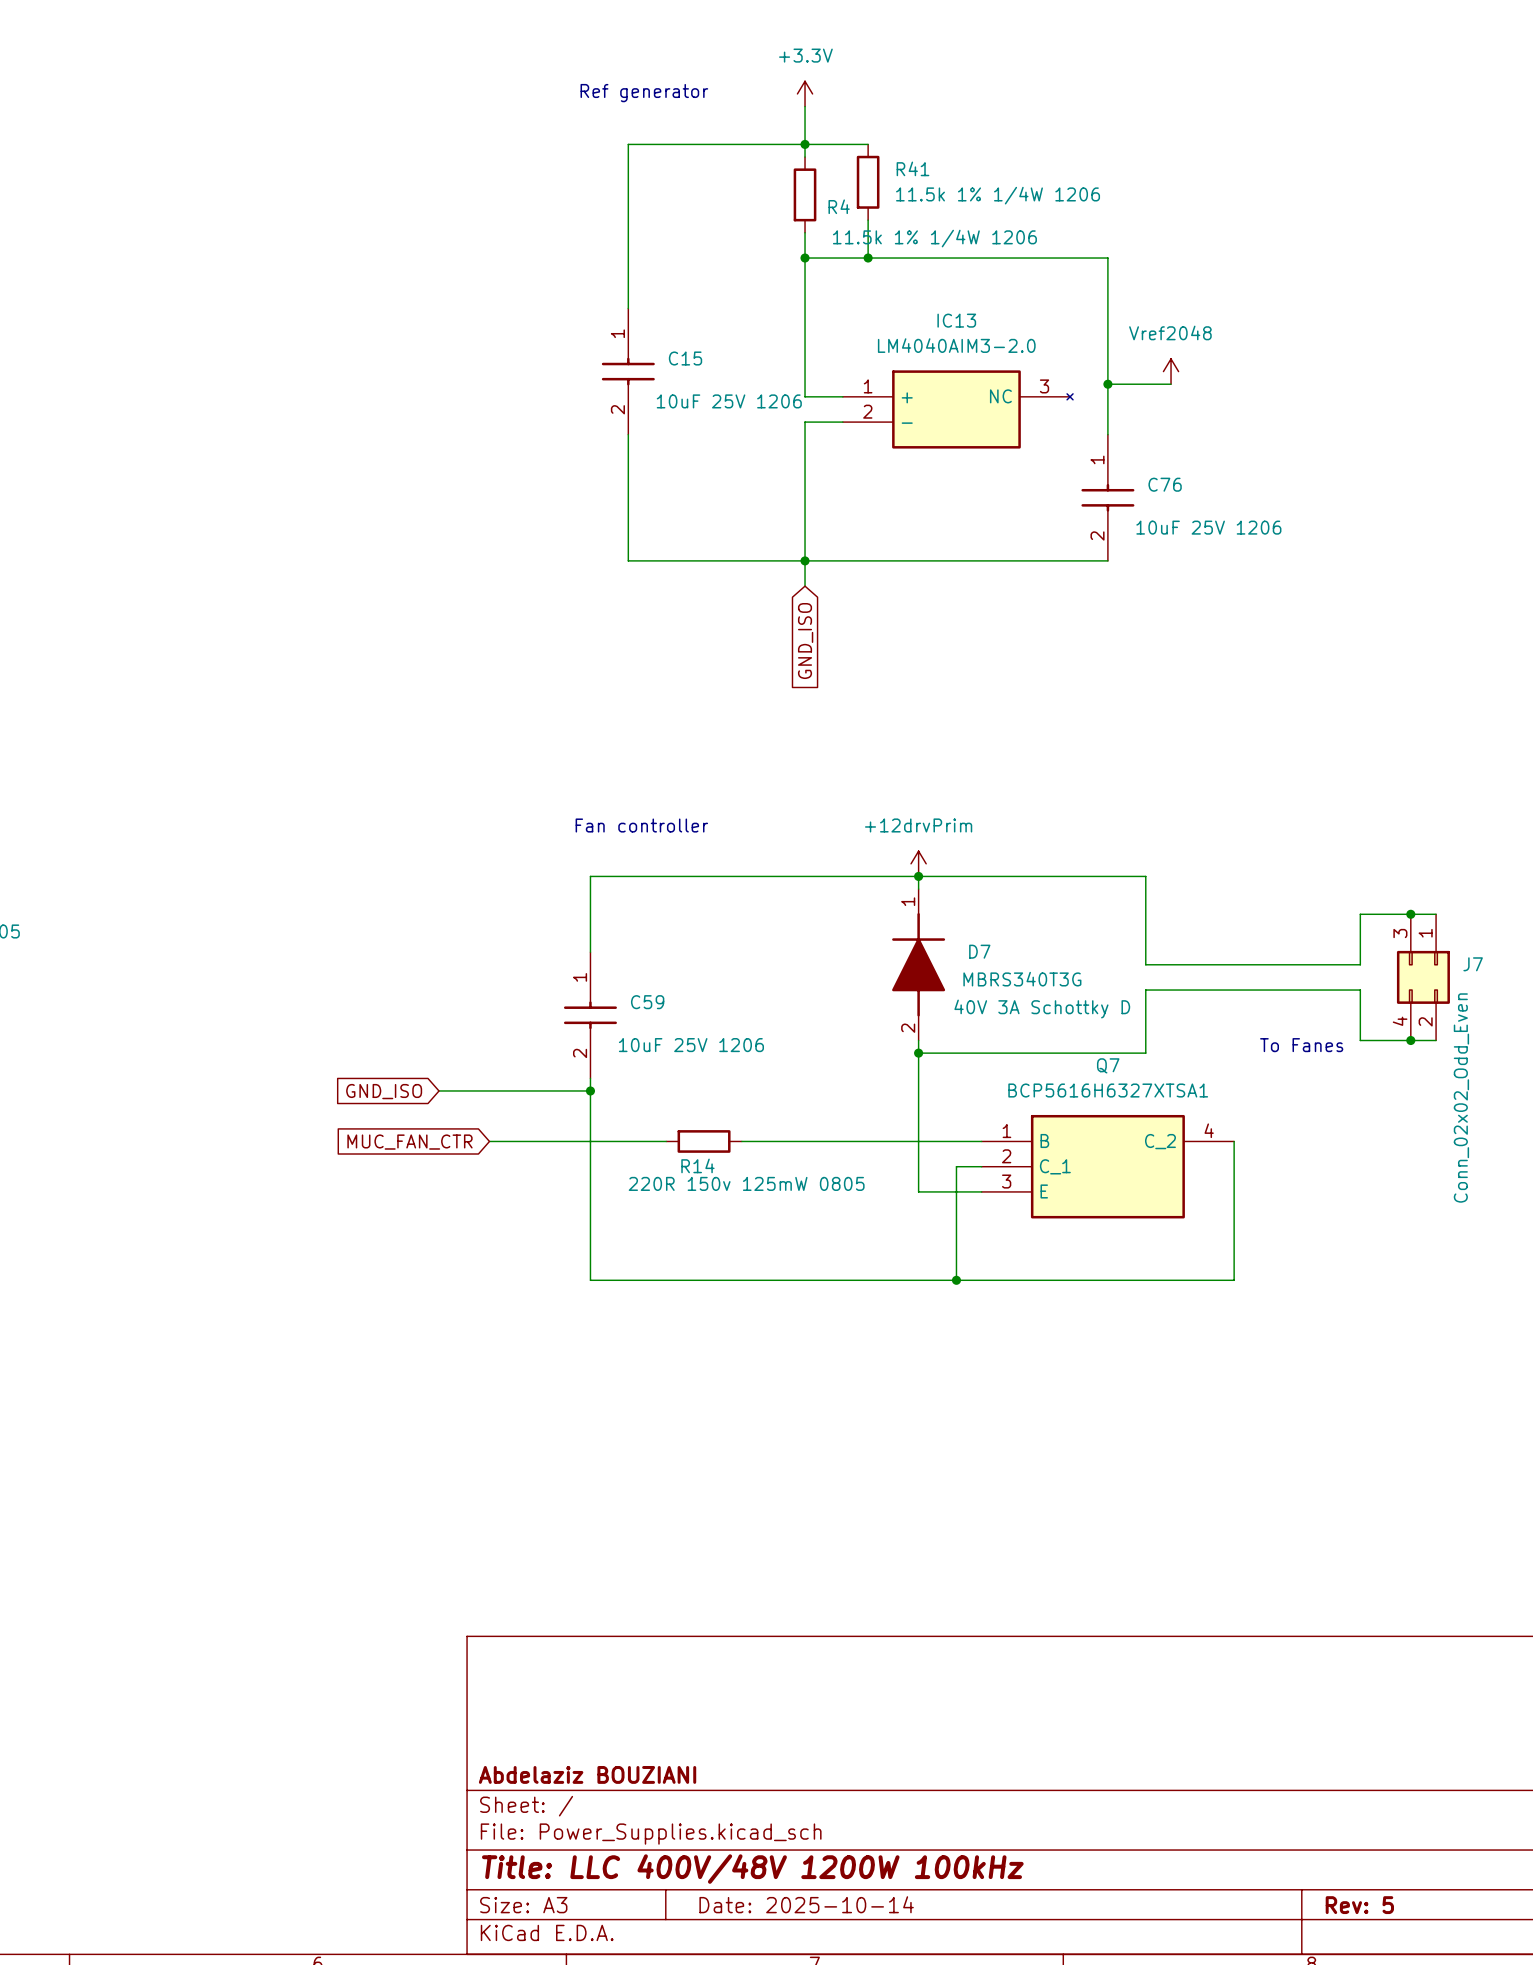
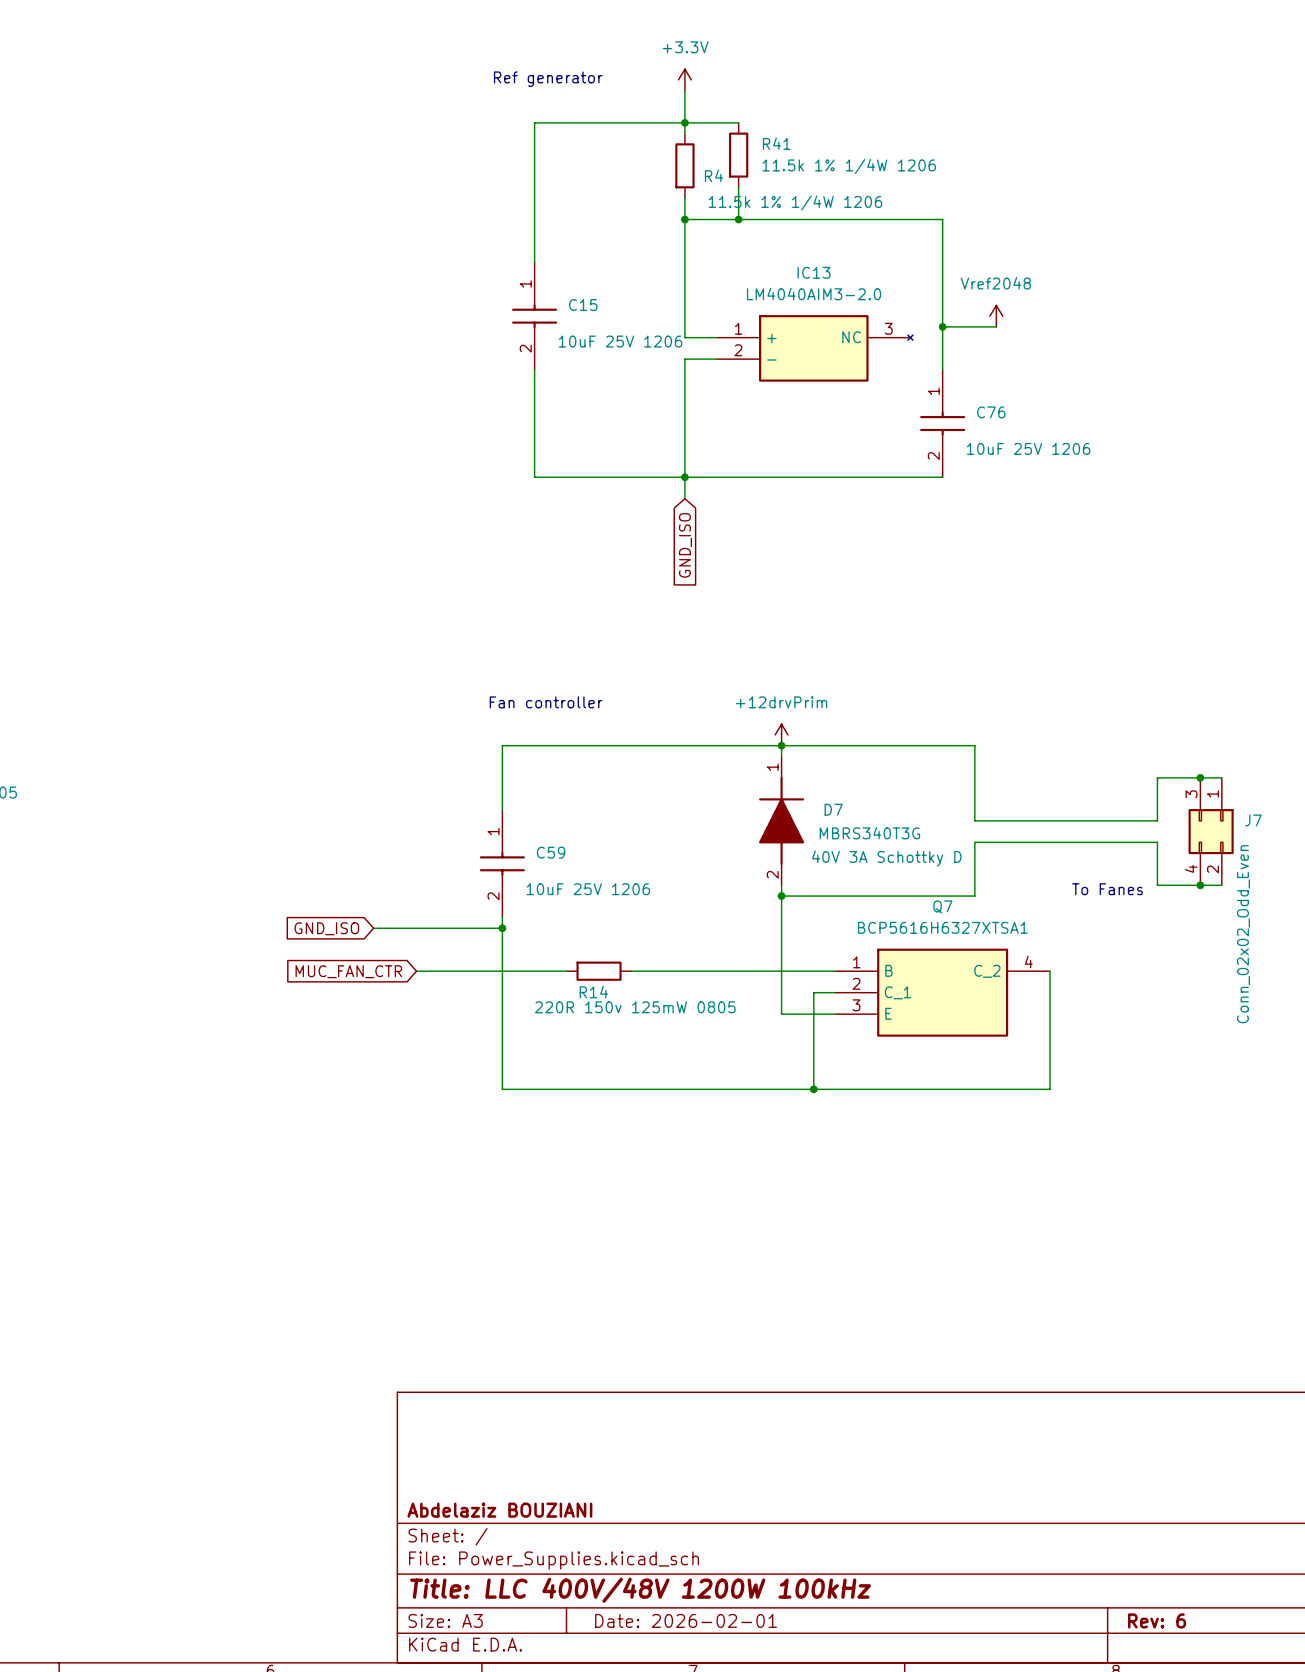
title block: Date: 2025-10-14 (806, 1904) -> Date: 2026-02-01 (686, 1620)
title block: Rev: 5 (1359, 1905) -> Rev: 6 (1157, 1620)

